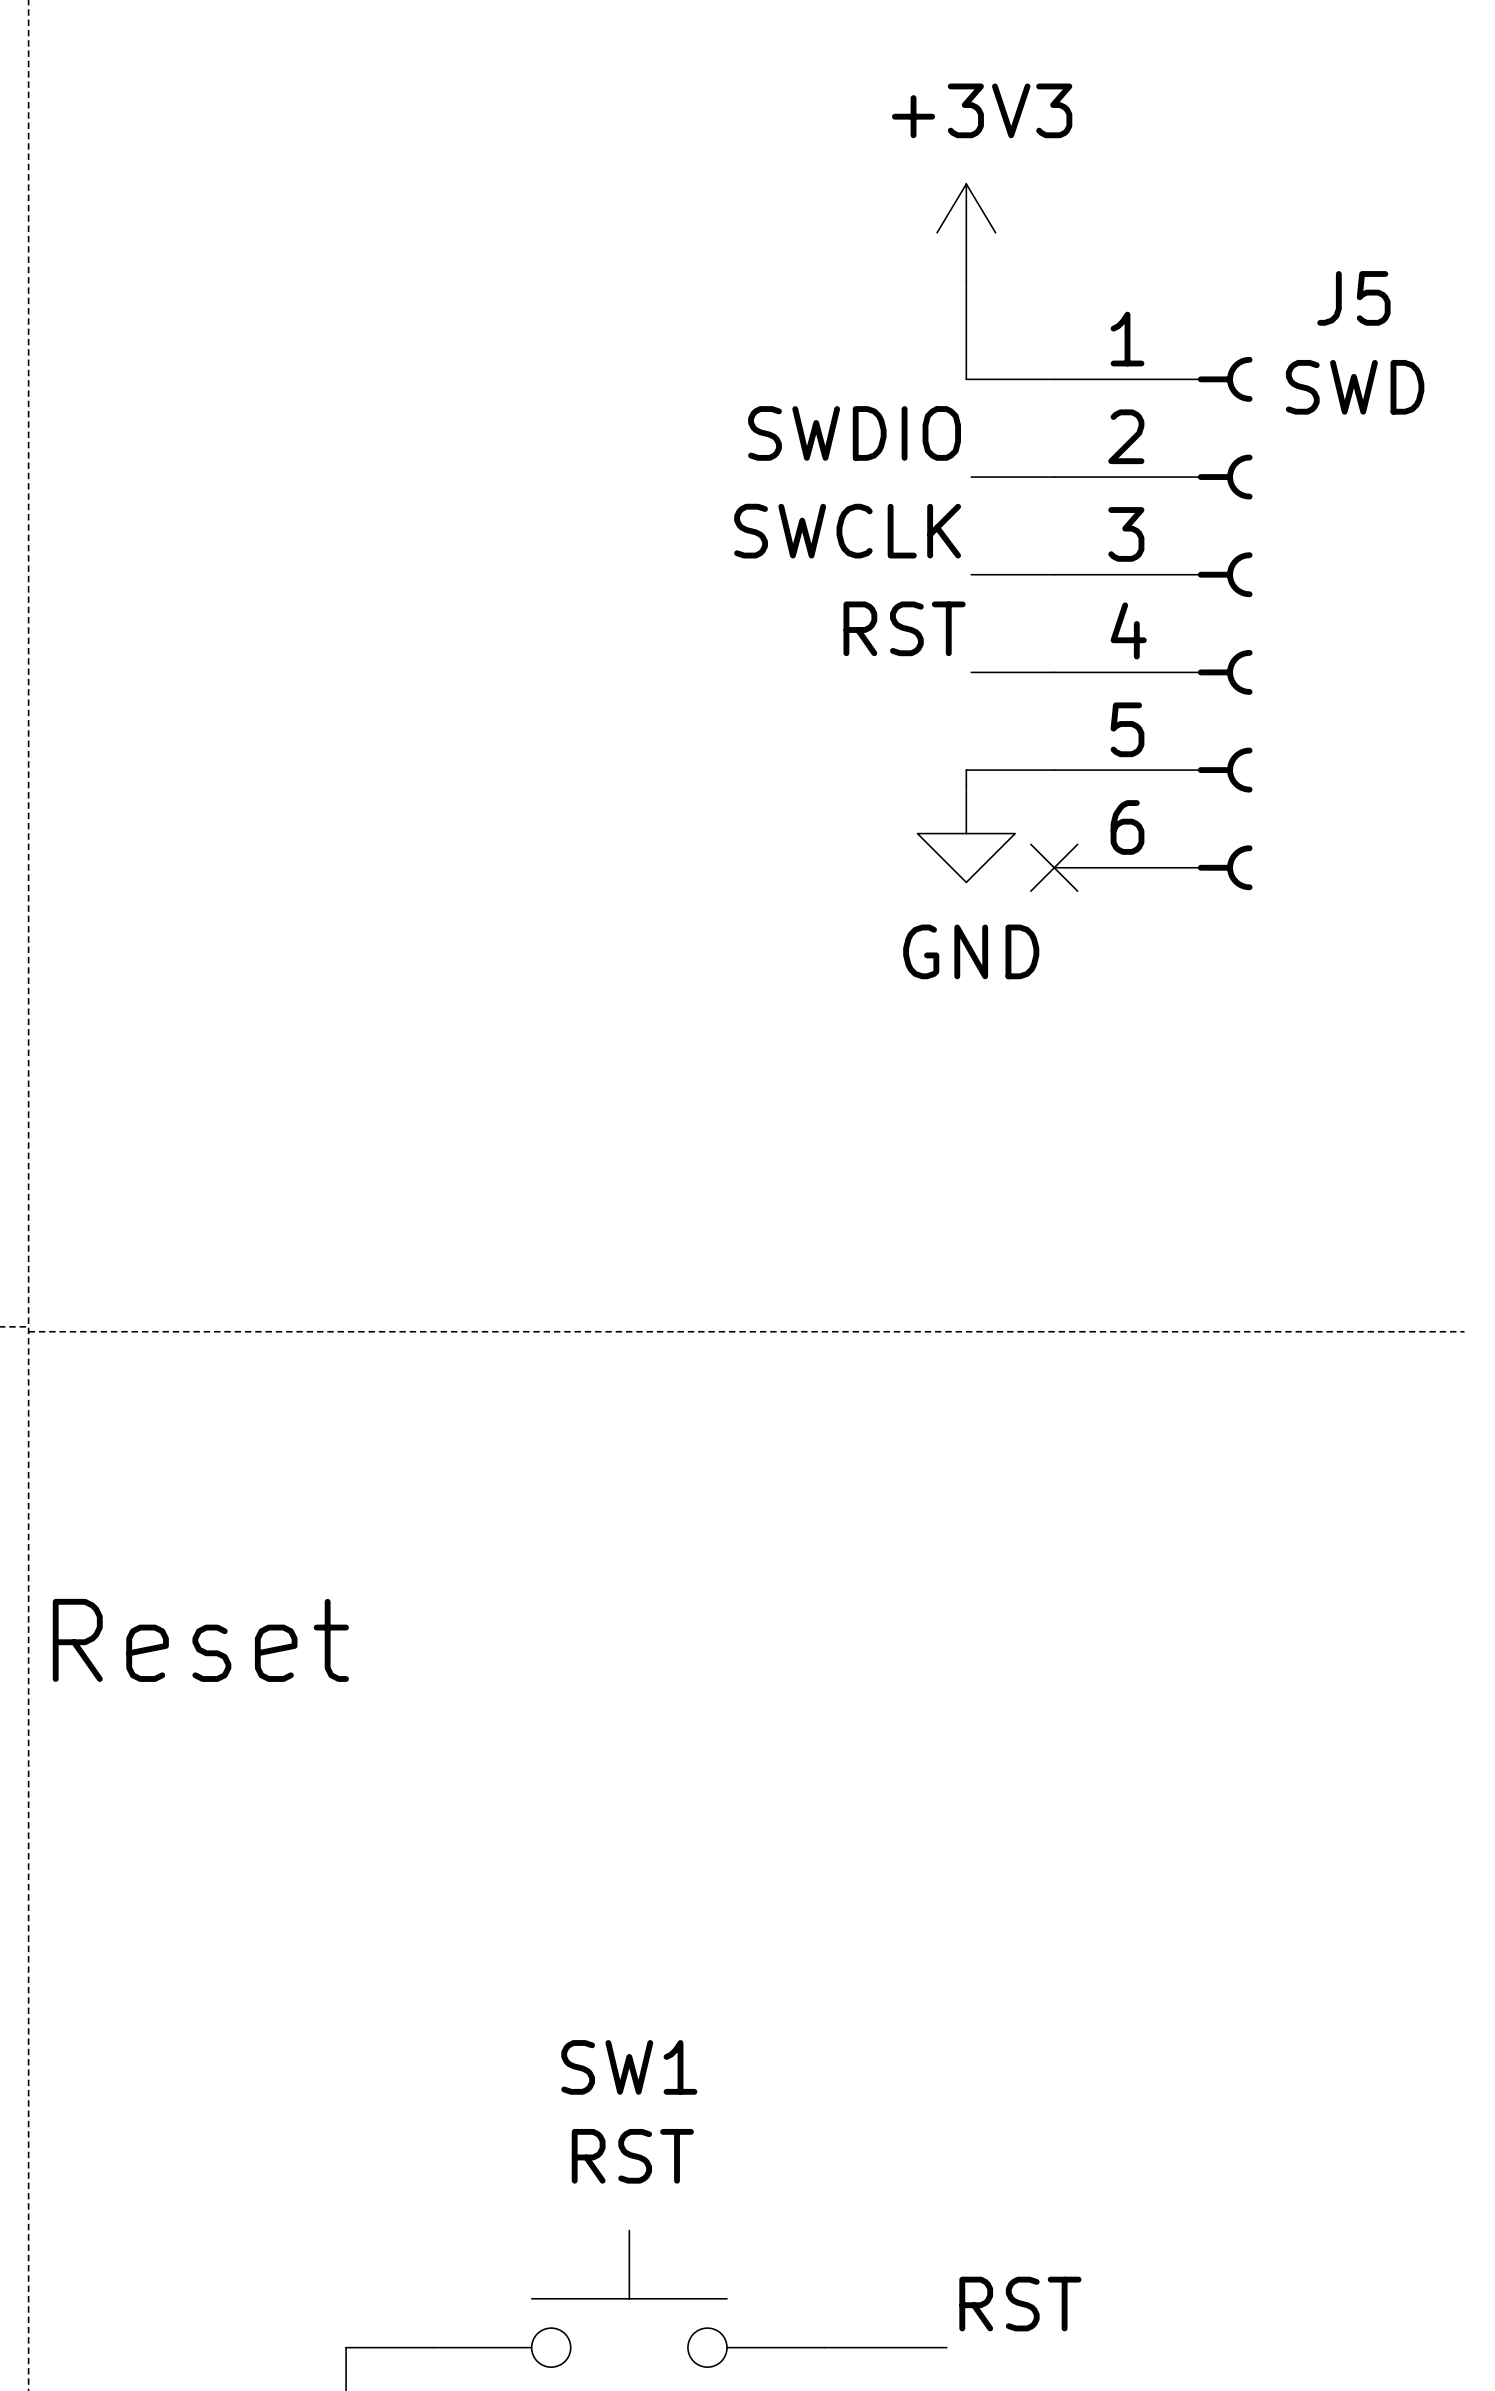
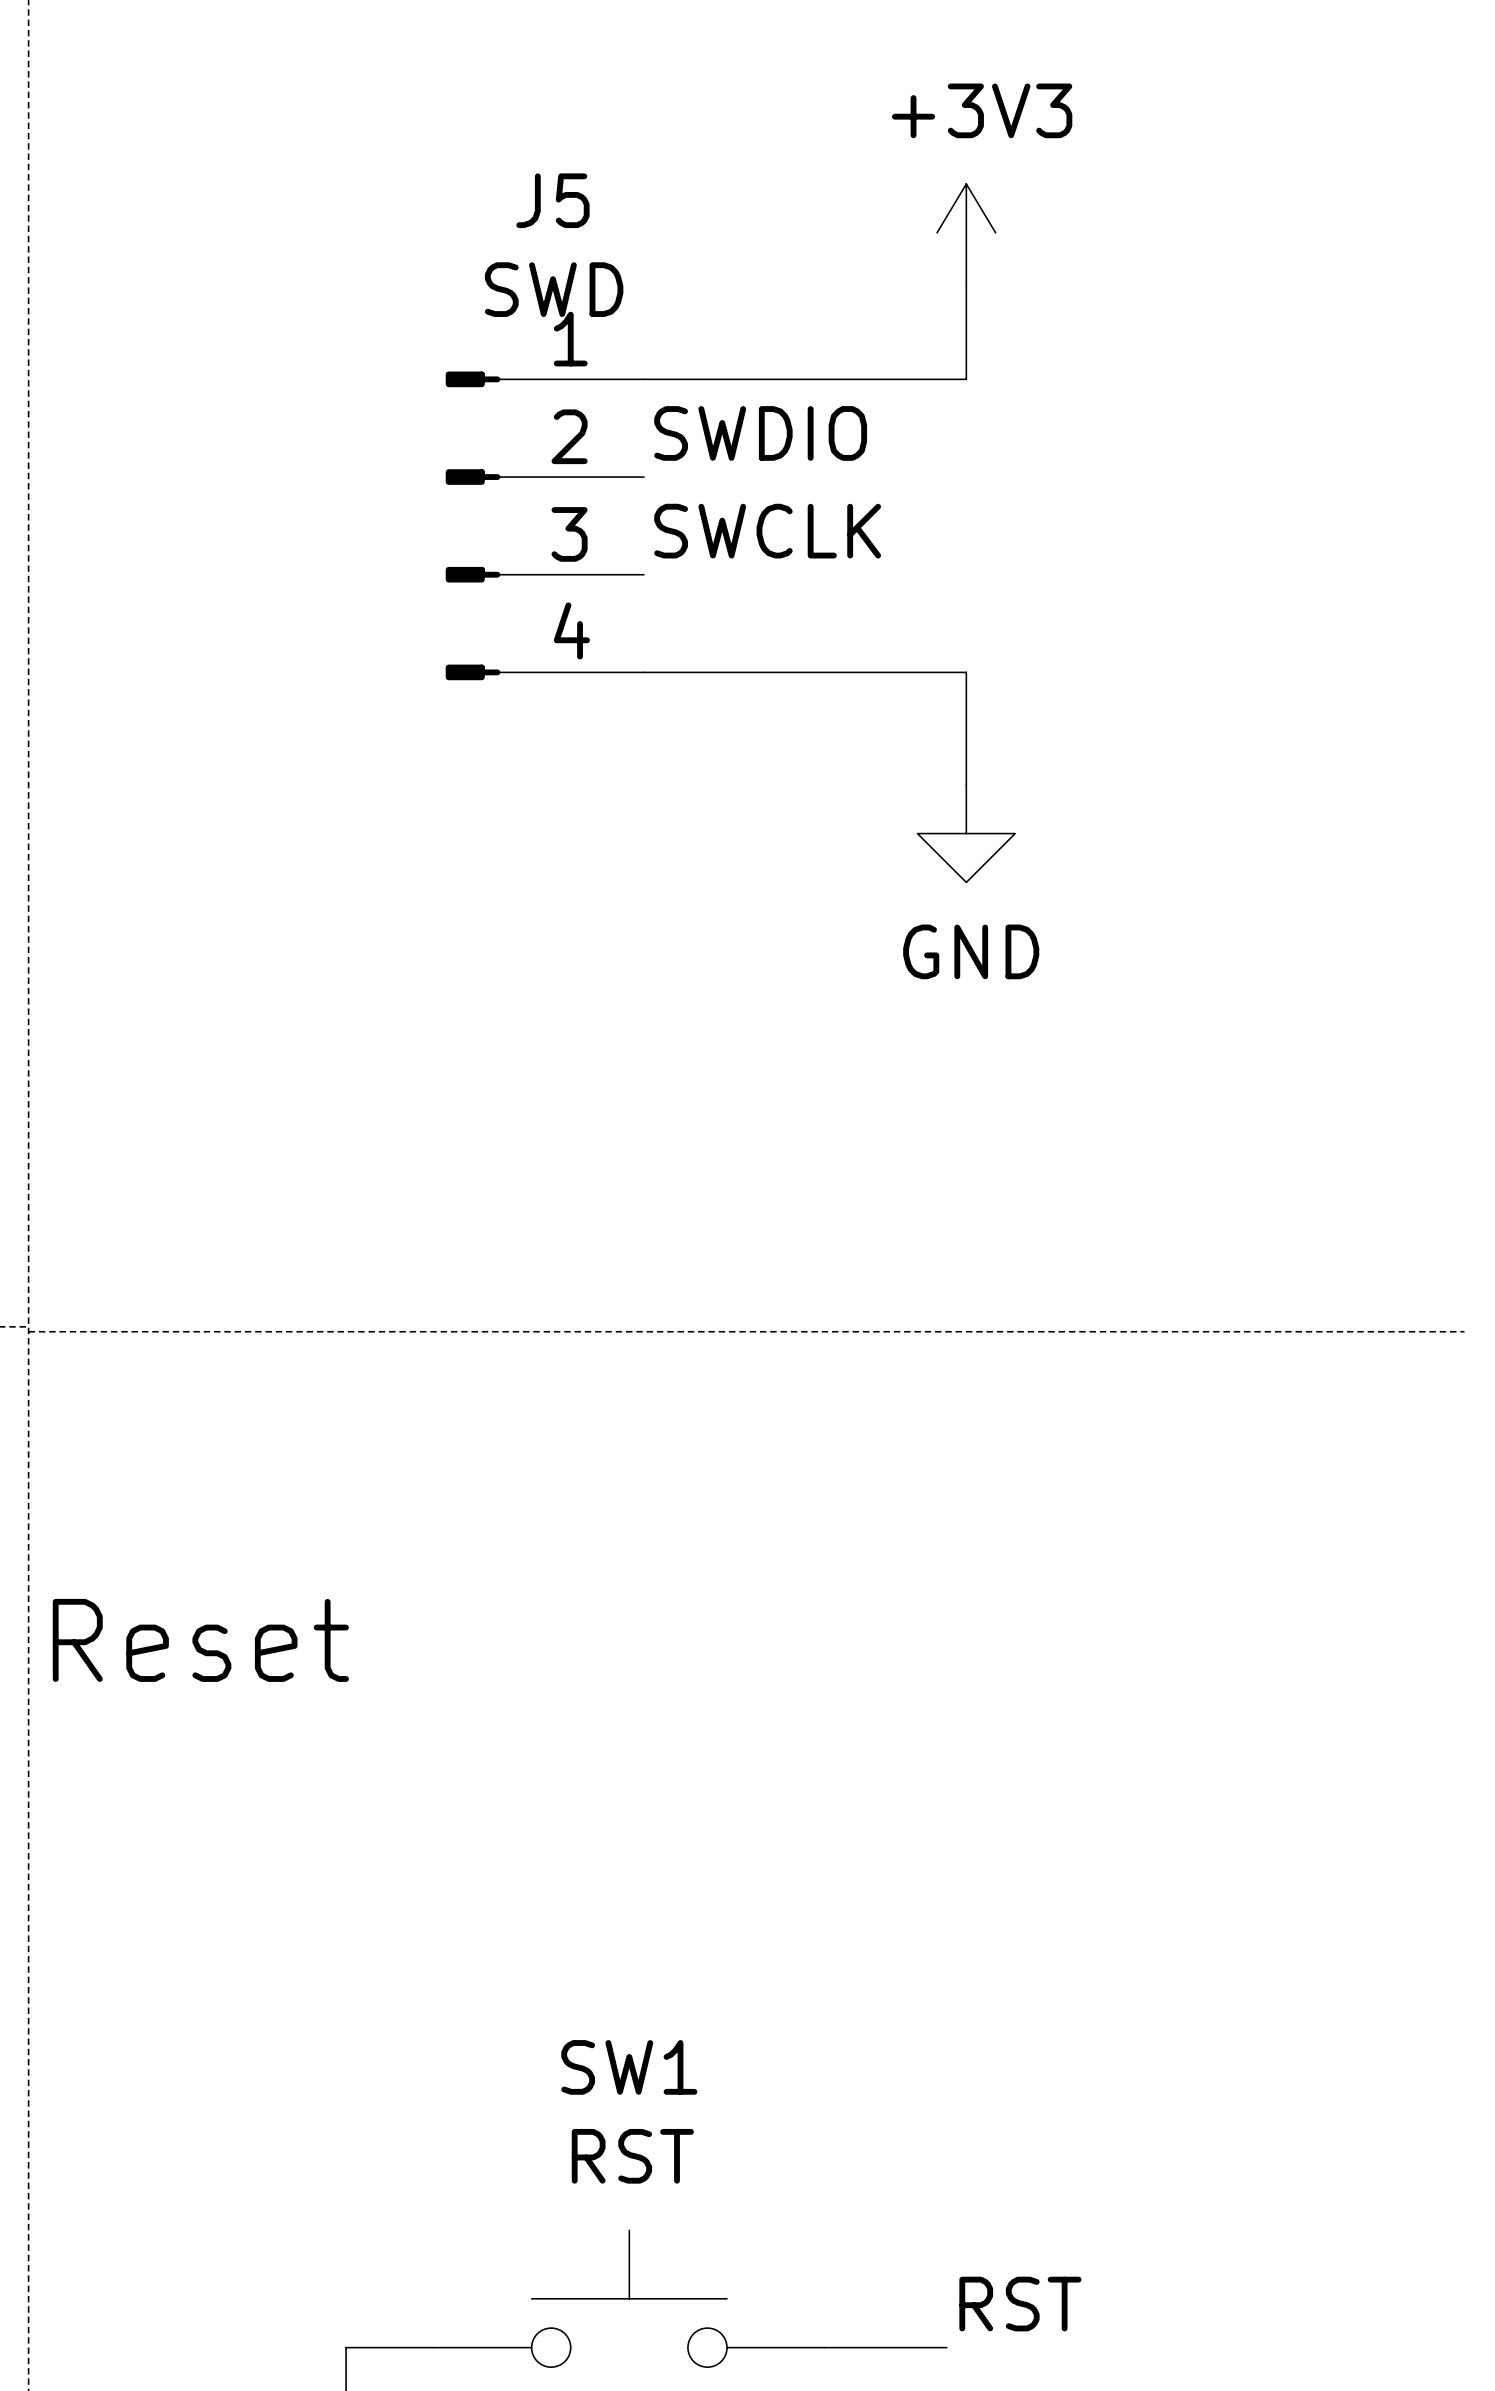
J5 name position: J5 (1353, 298) -> J5 (552, 200)
J5 symbol: [1054, 356, 1253, 891] -> [445, 371, 644, 681]
wire: (966, 379) (1054, 379) -> (966, 379) (643, 379)
J5 value position: SWD (1355, 387) -> SWD (554, 289)
label position: SWDIO (854, 433) -> SWDIO (760, 433)
wire: (971, 477) (1054, 477) -> none
label position: SWCLK (847, 531) -> SWCLK (767, 531)
wire: (971, 574) (1054, 574) -> none
label: RST (904, 628) -> none
wire: (971, 672) (1054, 672) -> none
wire: (966, 770) (1054, 770) -> (966, 770) (966, 672) (643, 672)
no-connect mark: (1054, 867) -> none

